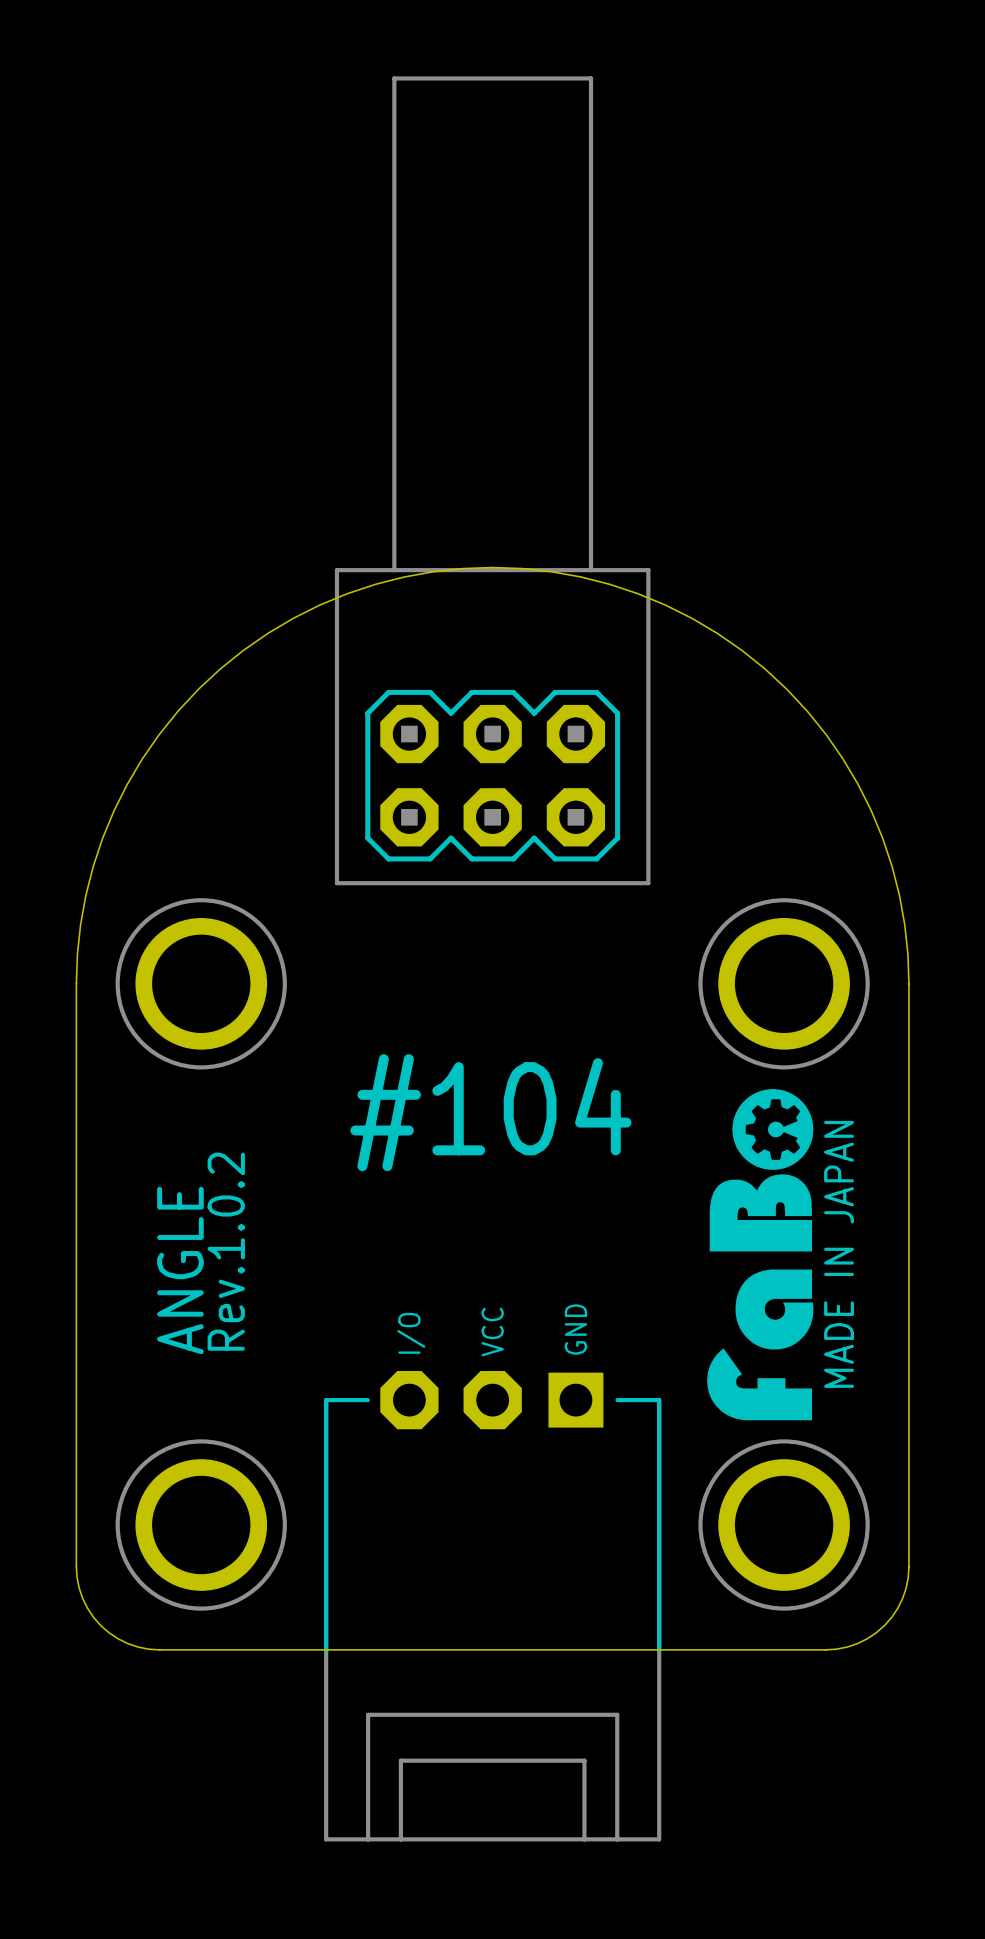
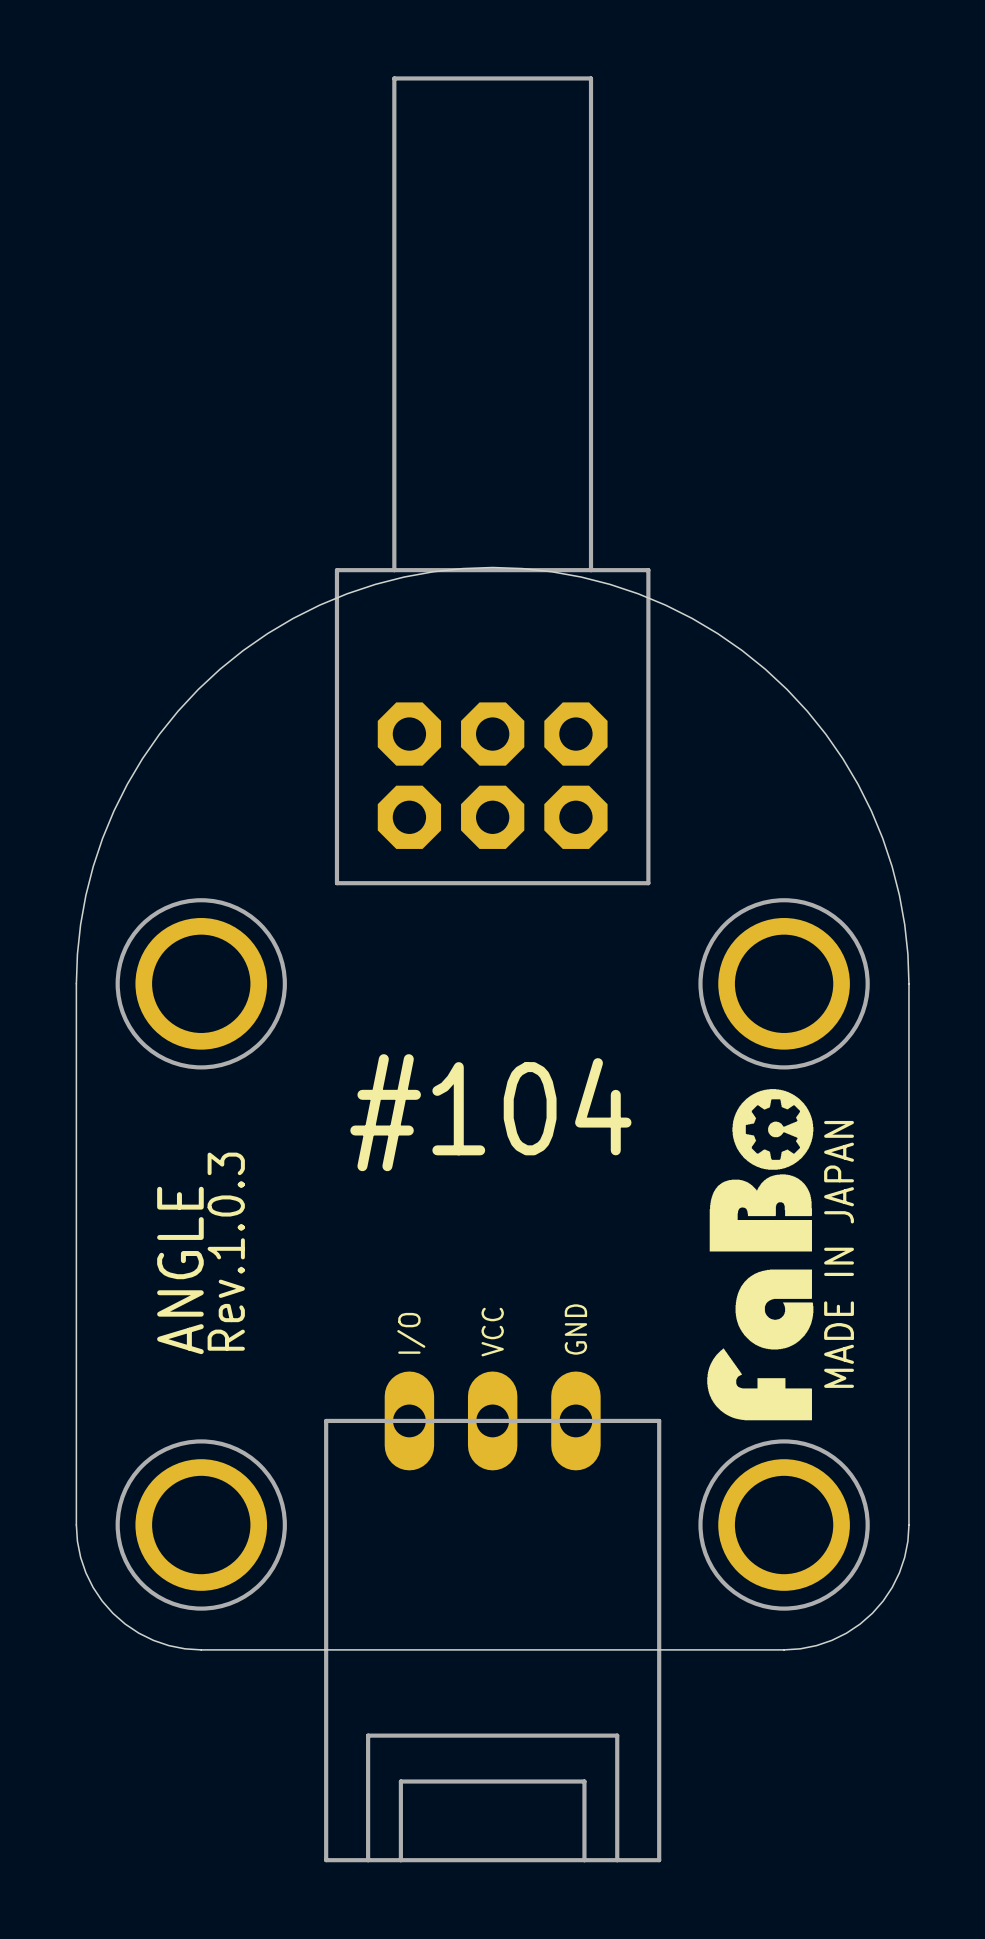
part footprint: [334, 76, 651, 886] -> [334, 76, 651, 886]
part footprint: [76, 567, 909, 1842] -> [76, 567, 909, 1863]
text: Rev.1.0.2 (226, 1251) -> Rev.1.0.3 (226, 1251)

